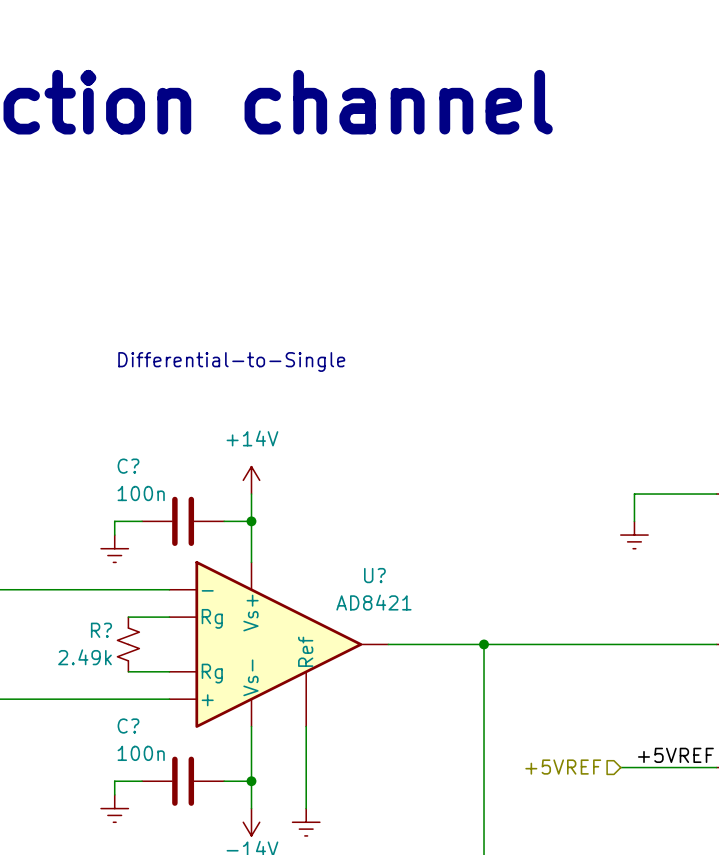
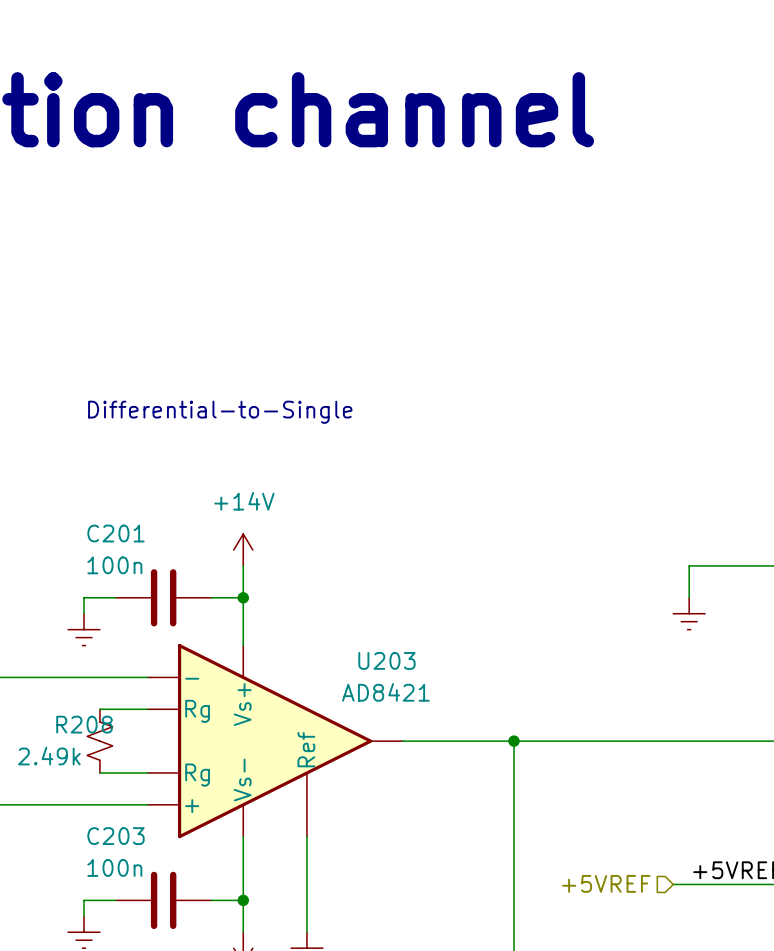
C? name: C? (128, 466) -> C201 (115, 533)
U? name: U? (374, 575) -> U203 (386, 660)
R? name: R? (101, 630) -> R208 (84, 724)
C? name: C? (128, 726) -> C203 (115, 836)

